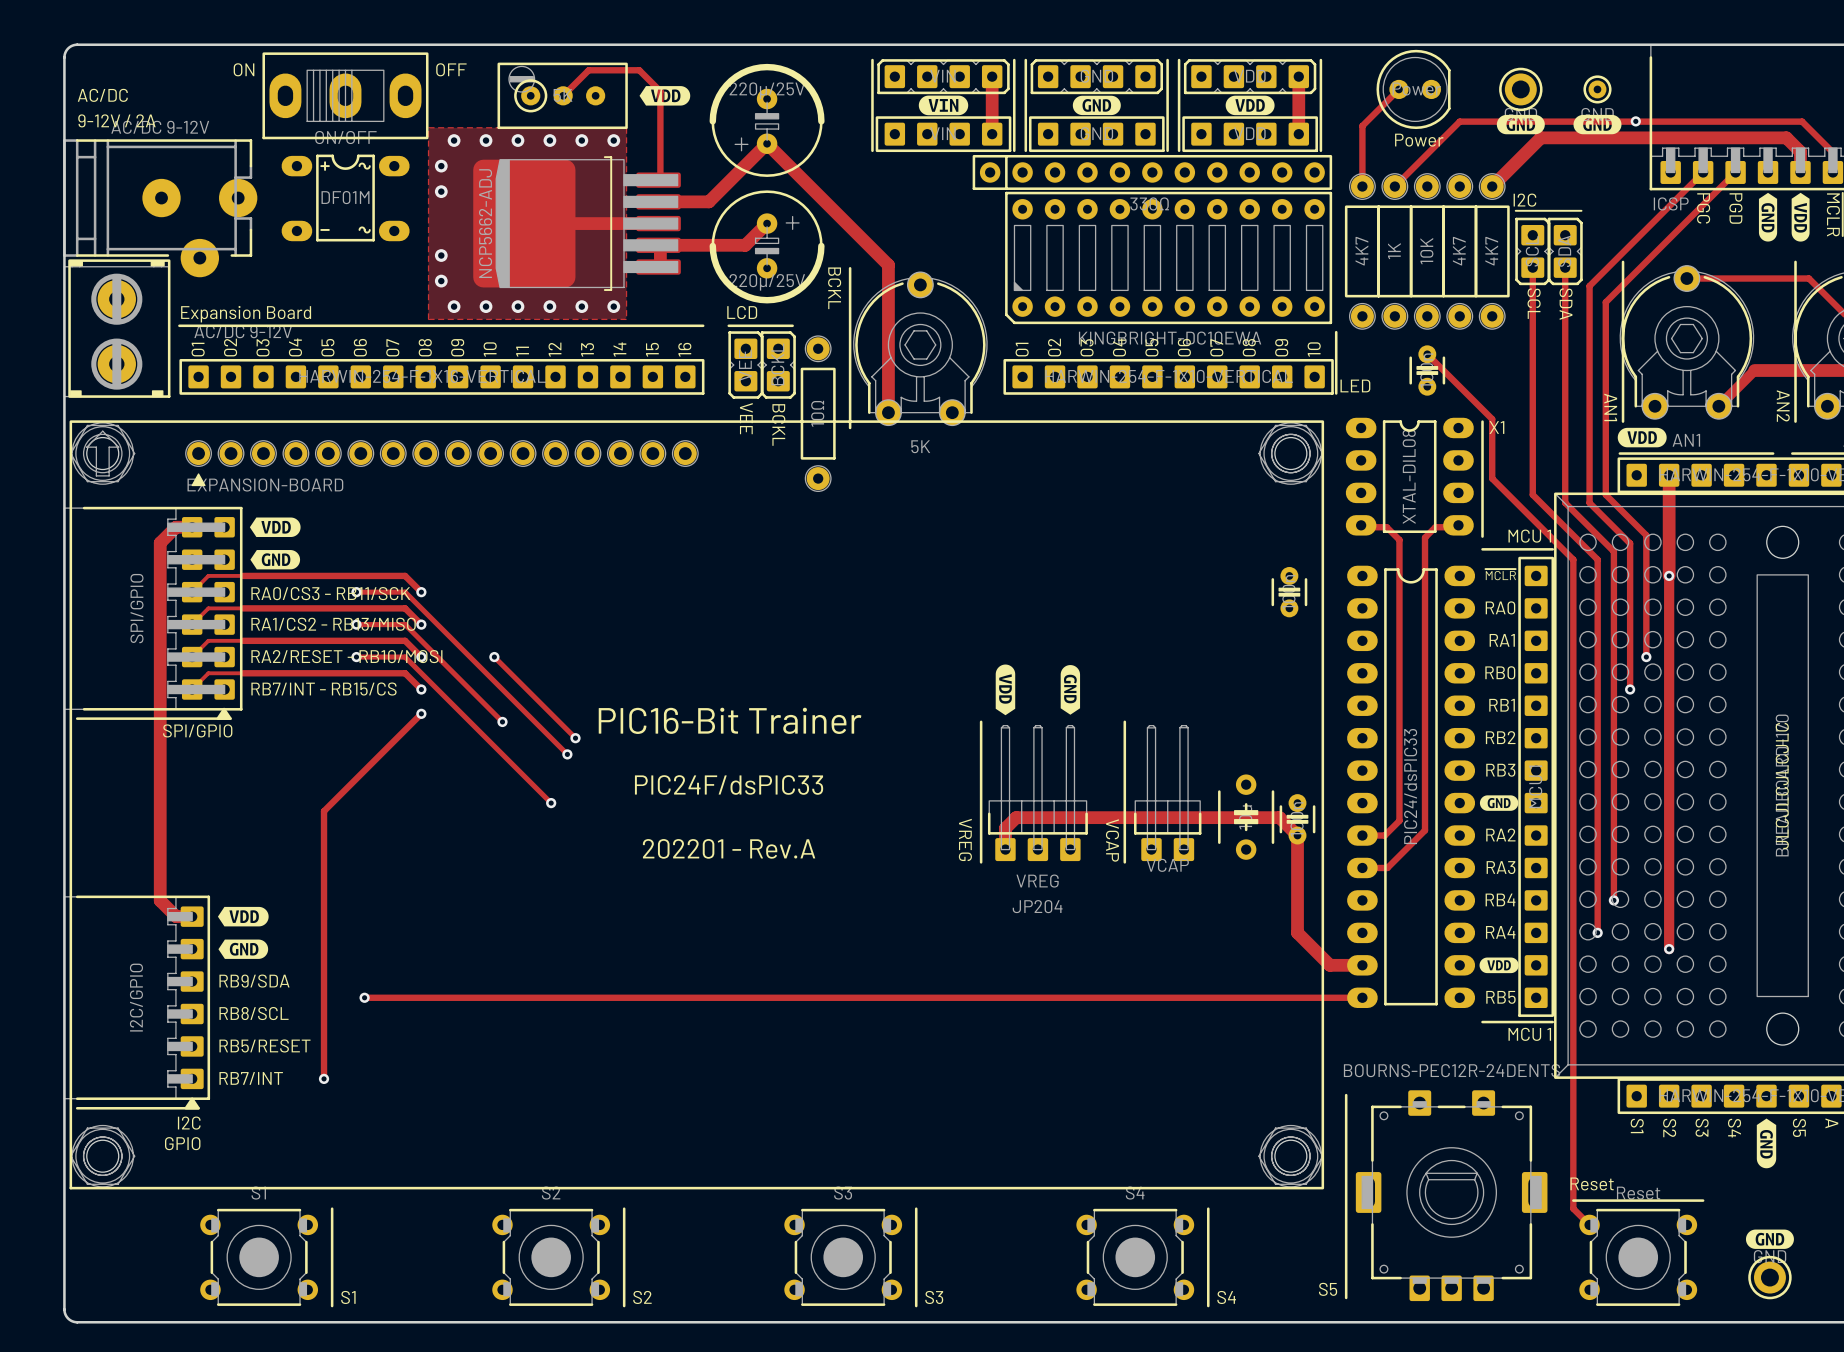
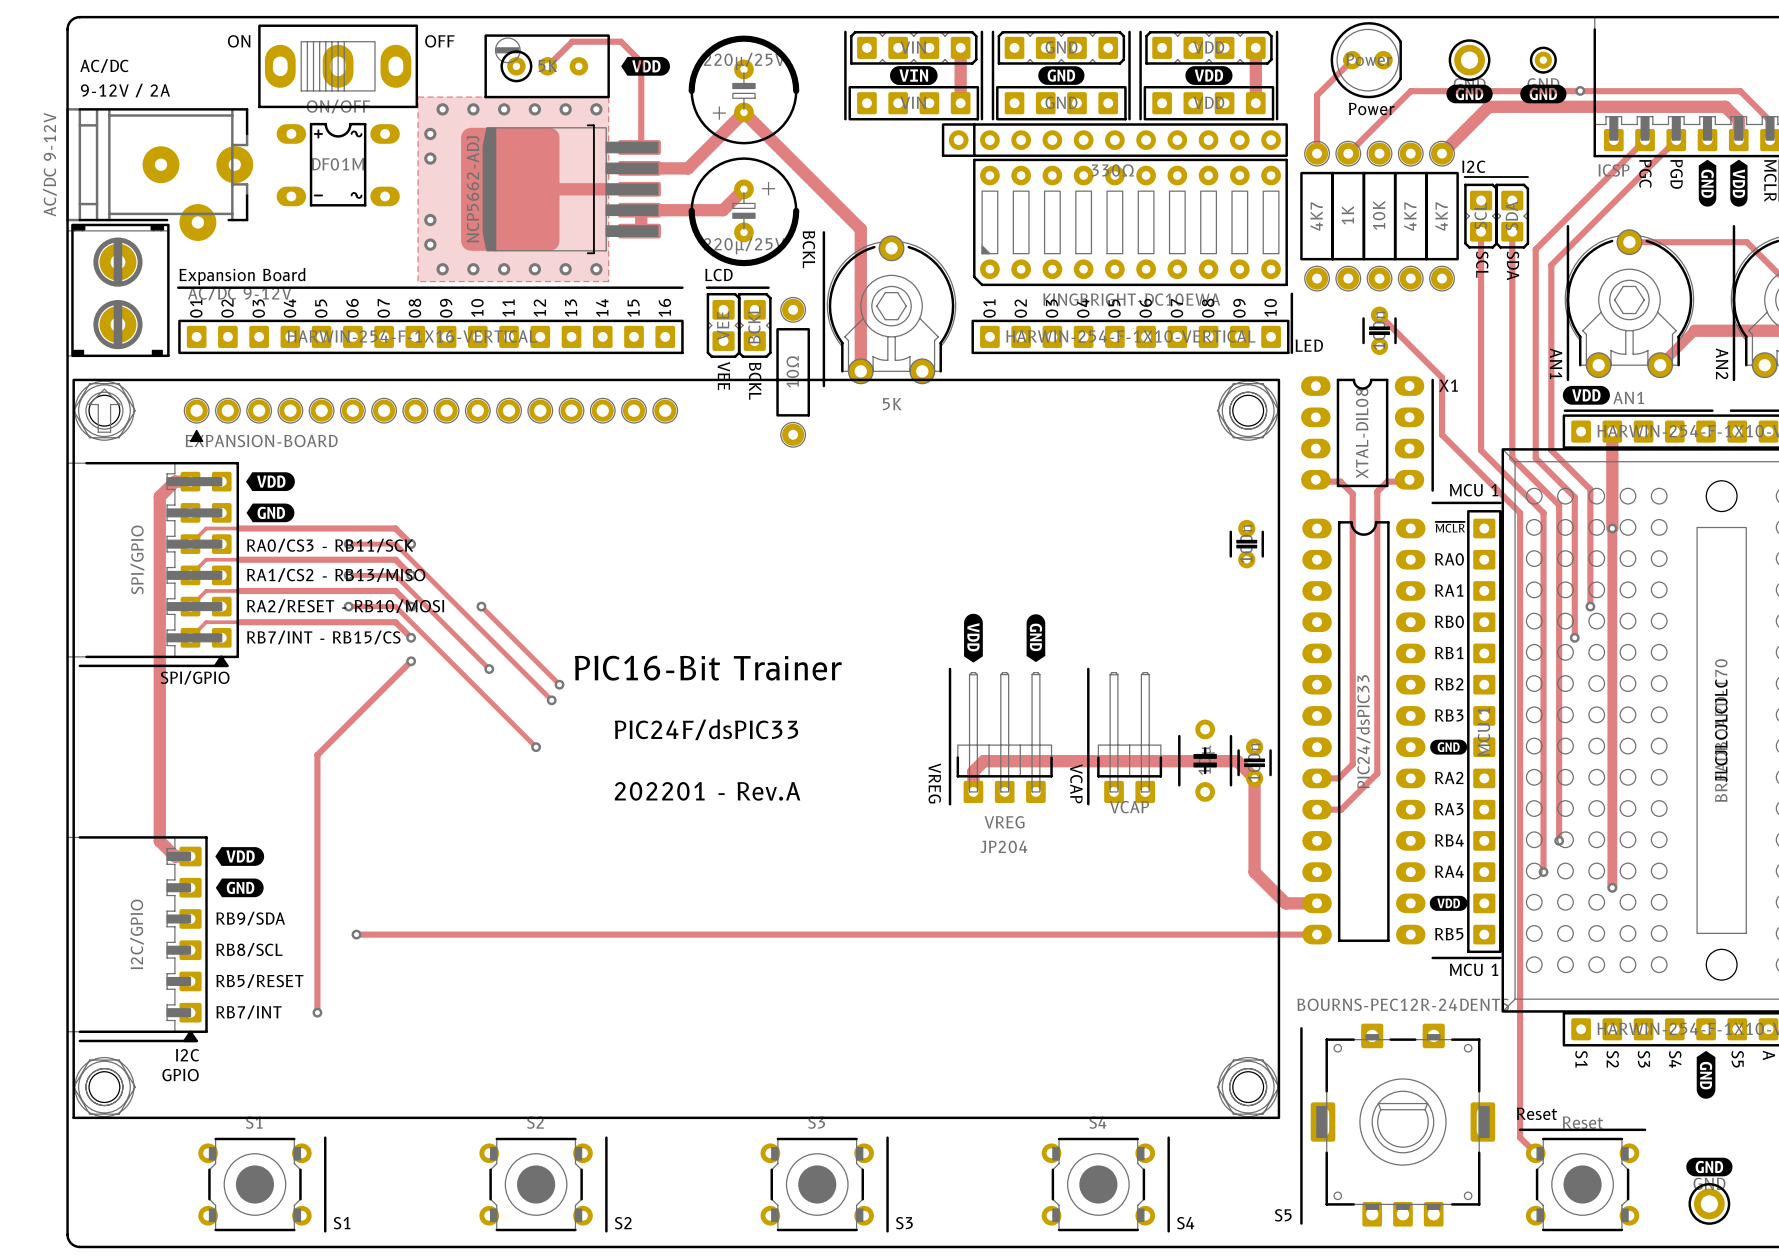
part value rotation: 0° (160, 127) -> 90° counterclockwise (49, 164)

